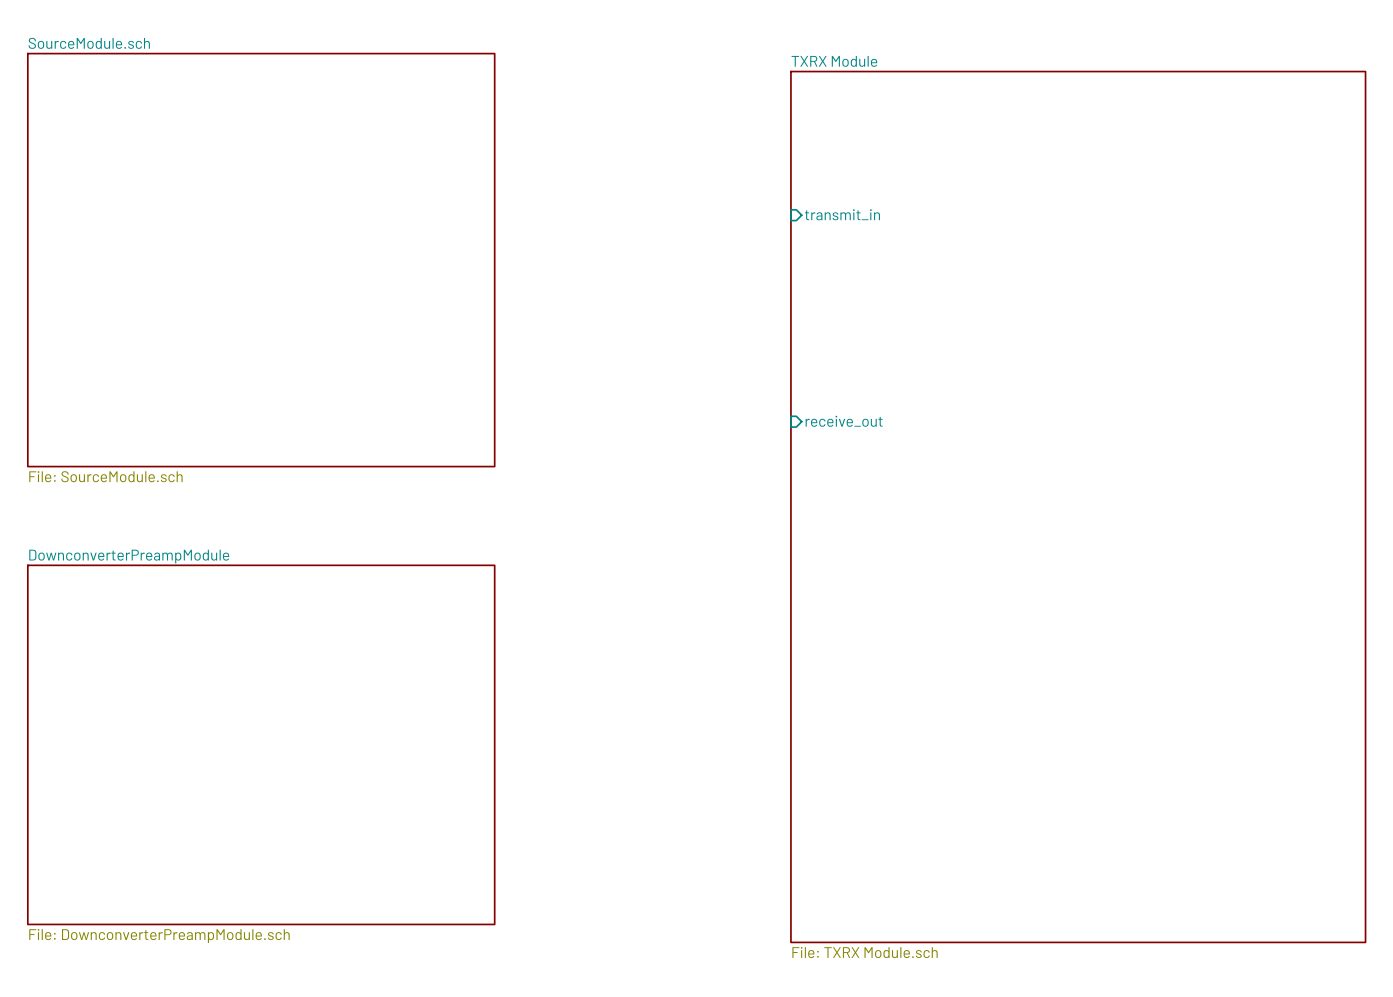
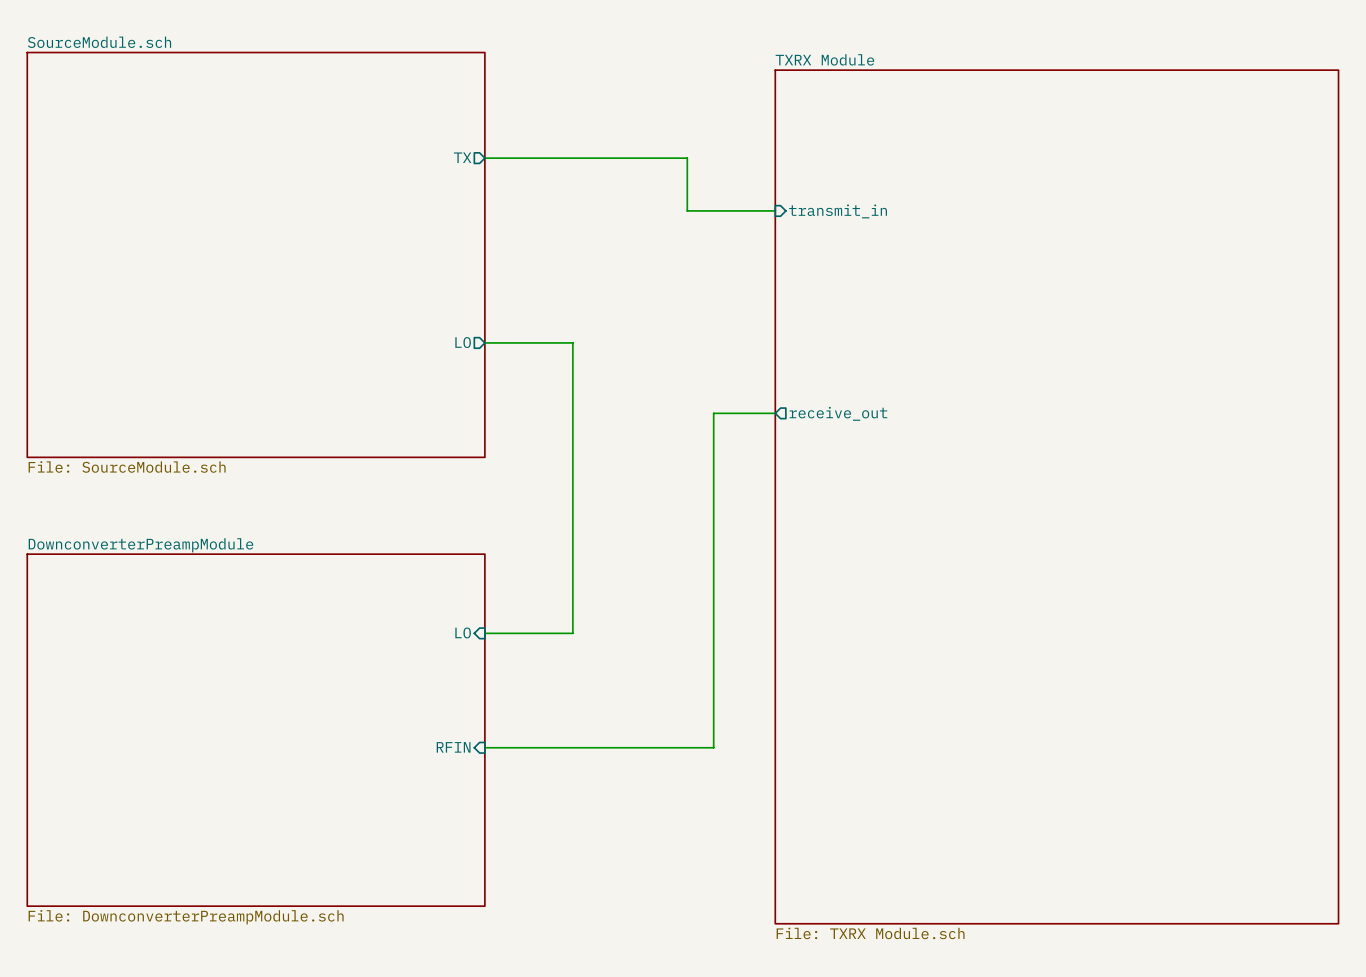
sheet pin: none -> TX (462, 157)
wire: none -> (484, 158) (687, 158) (687, 210) (775, 210)
sheet pin: none -> LO (463, 342)
wire: none -> (484, 342) (572, 342) (572, 633) (484, 633)
wire: none -> (775, 413) (713, 413) (713, 747) (484, 747)
sheet pin shape: input (844, 421) -> output (838, 413)
sheet pin: none -> LO (463, 632)
sheet pin: none -> RFIN (453, 747)

